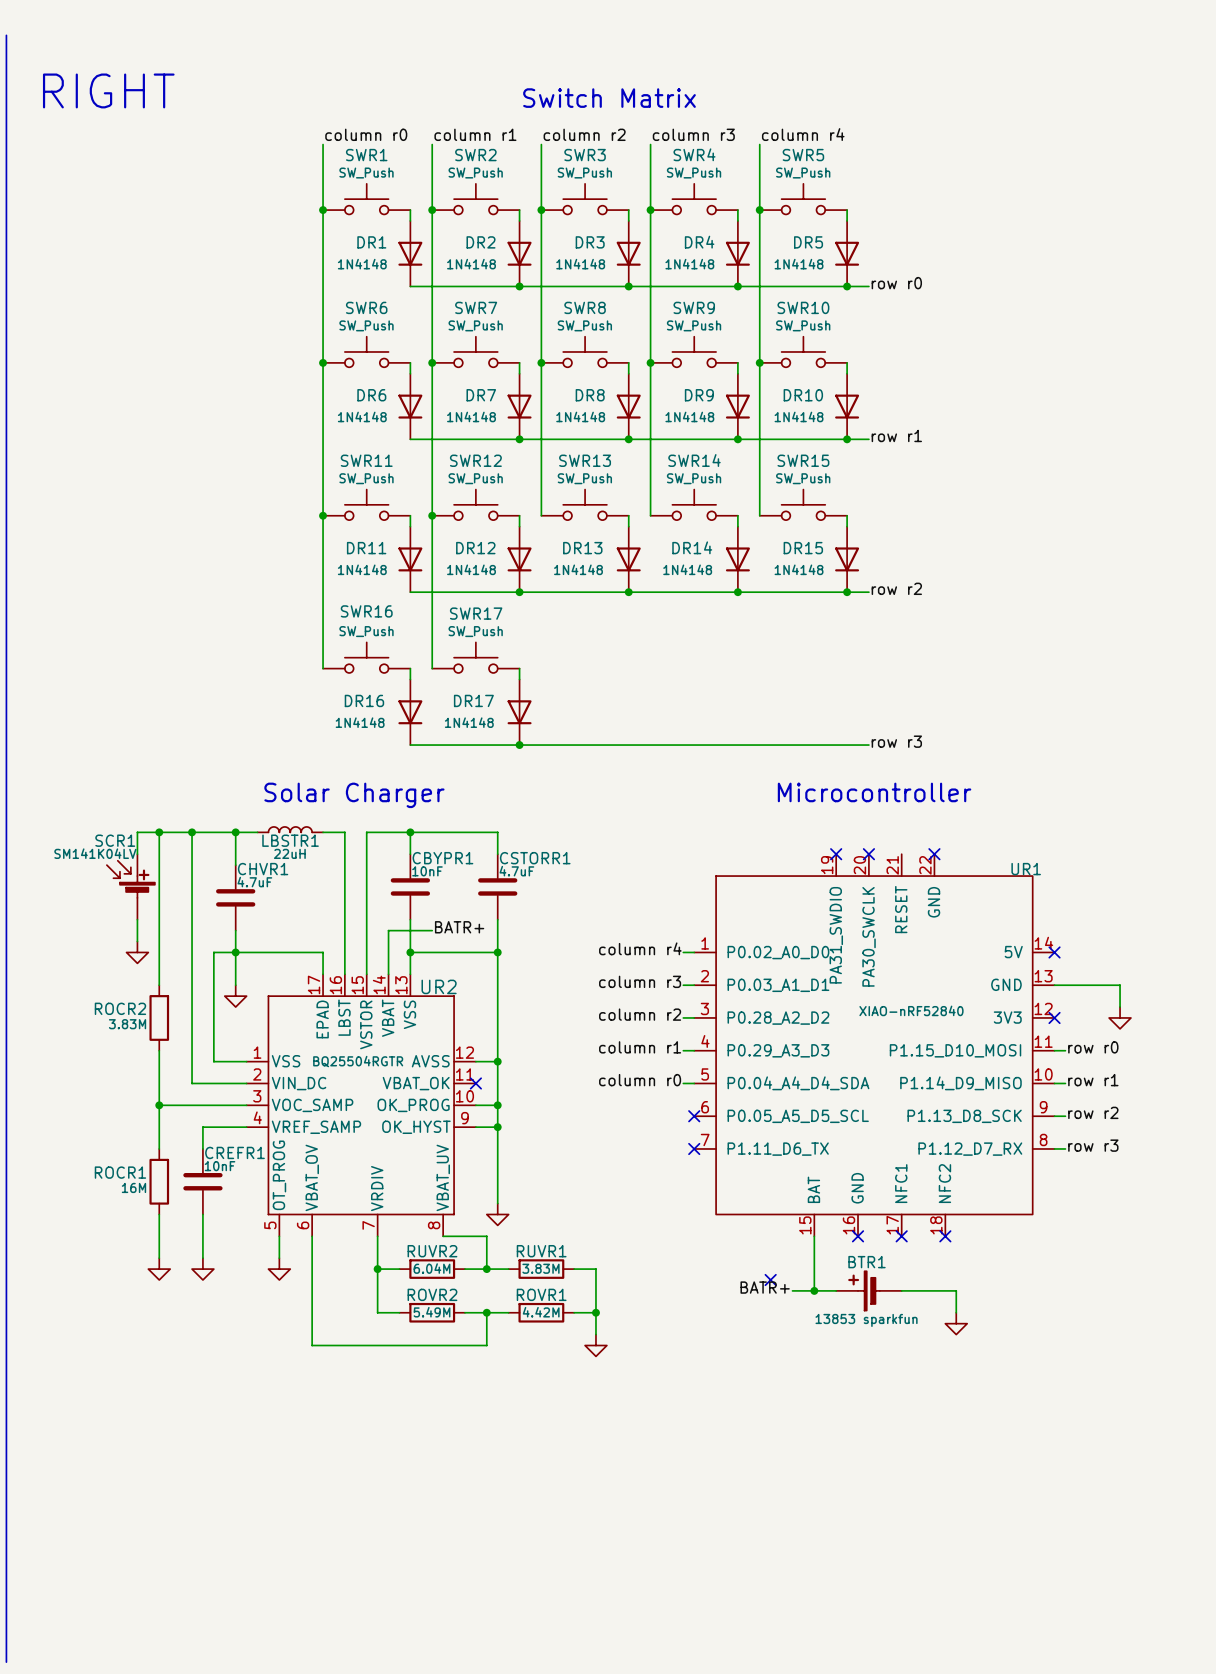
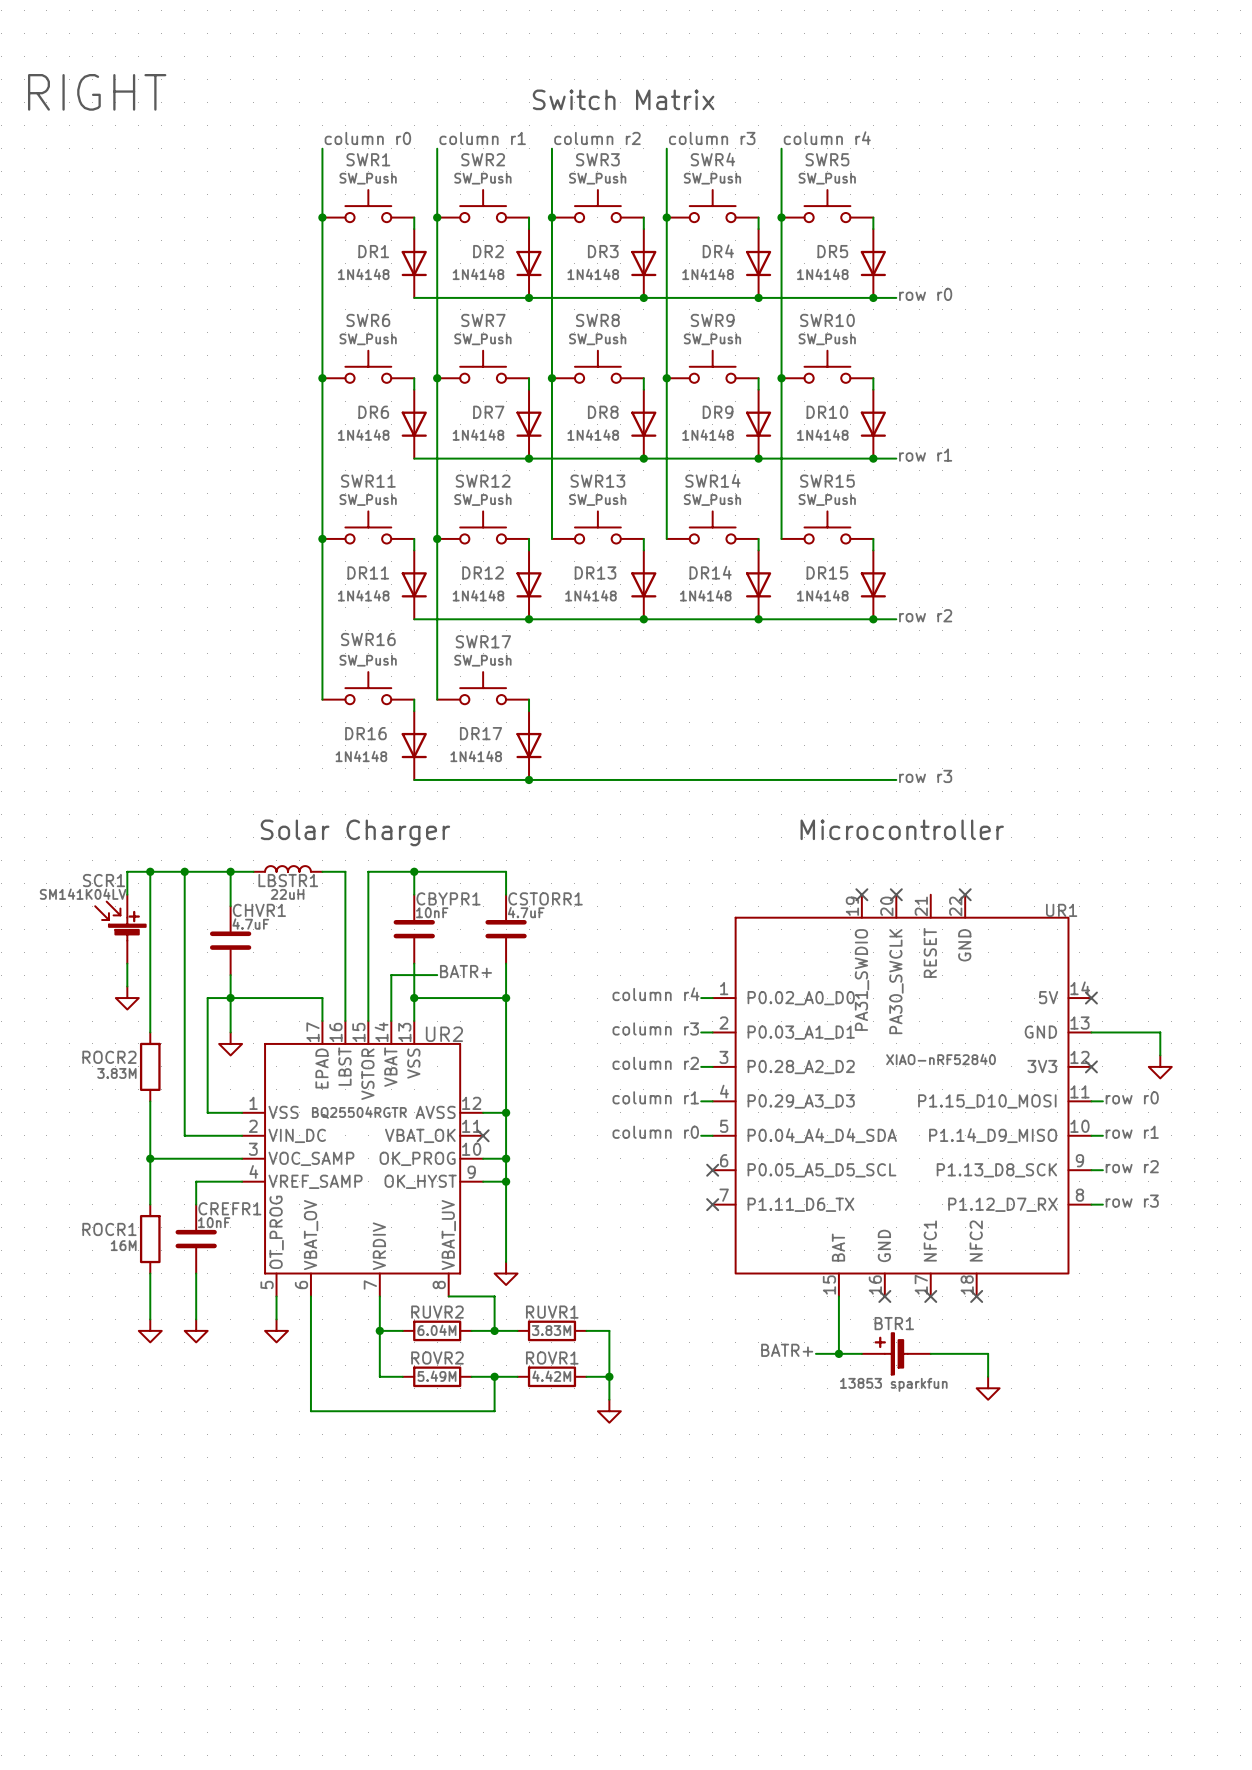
no-connect mark: (770, 1280) -> none

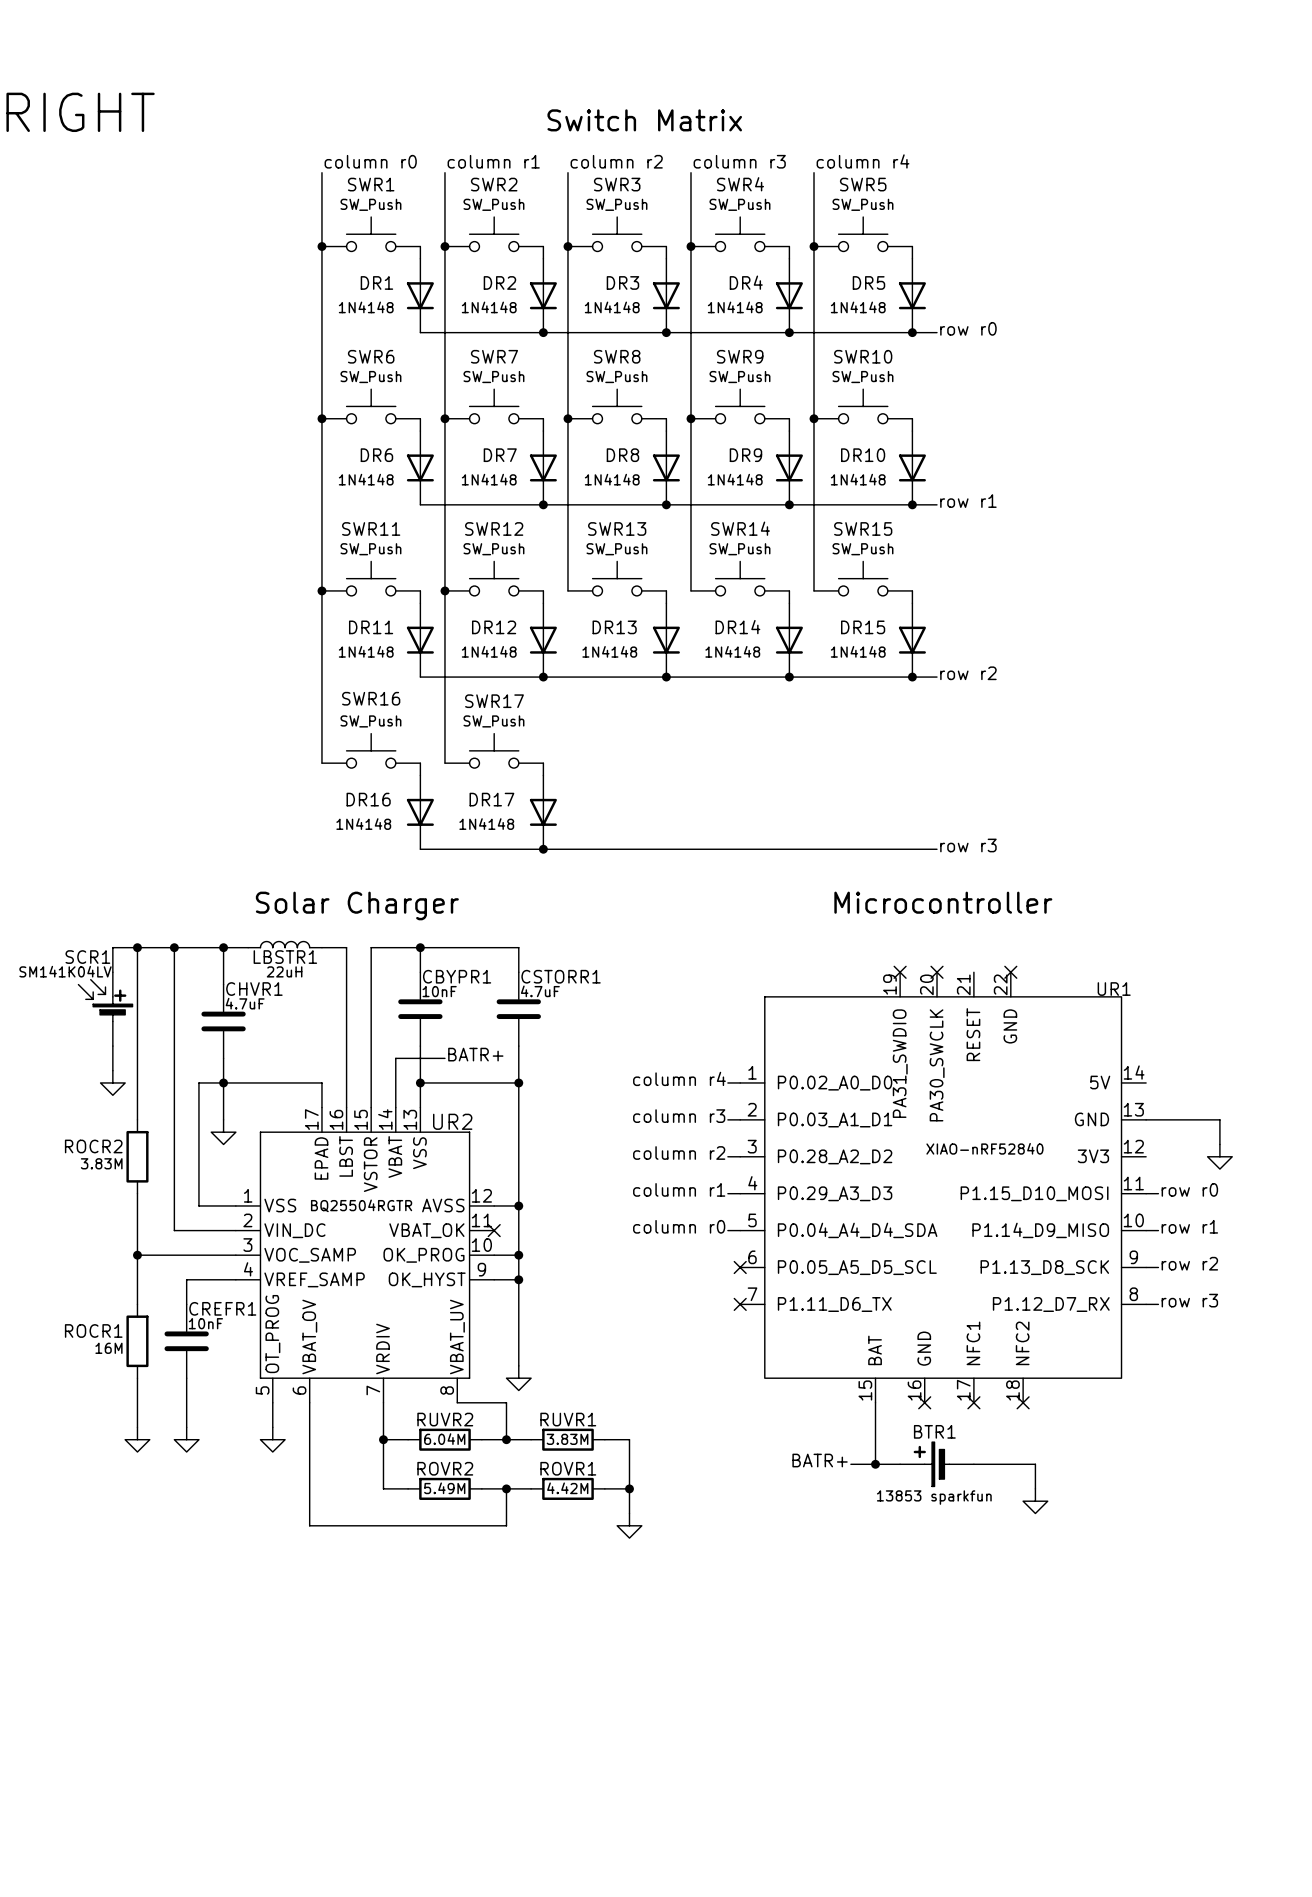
no-connect mark: (1091, 998) -> none
no-connect mark: (1091, 1066) -> none

